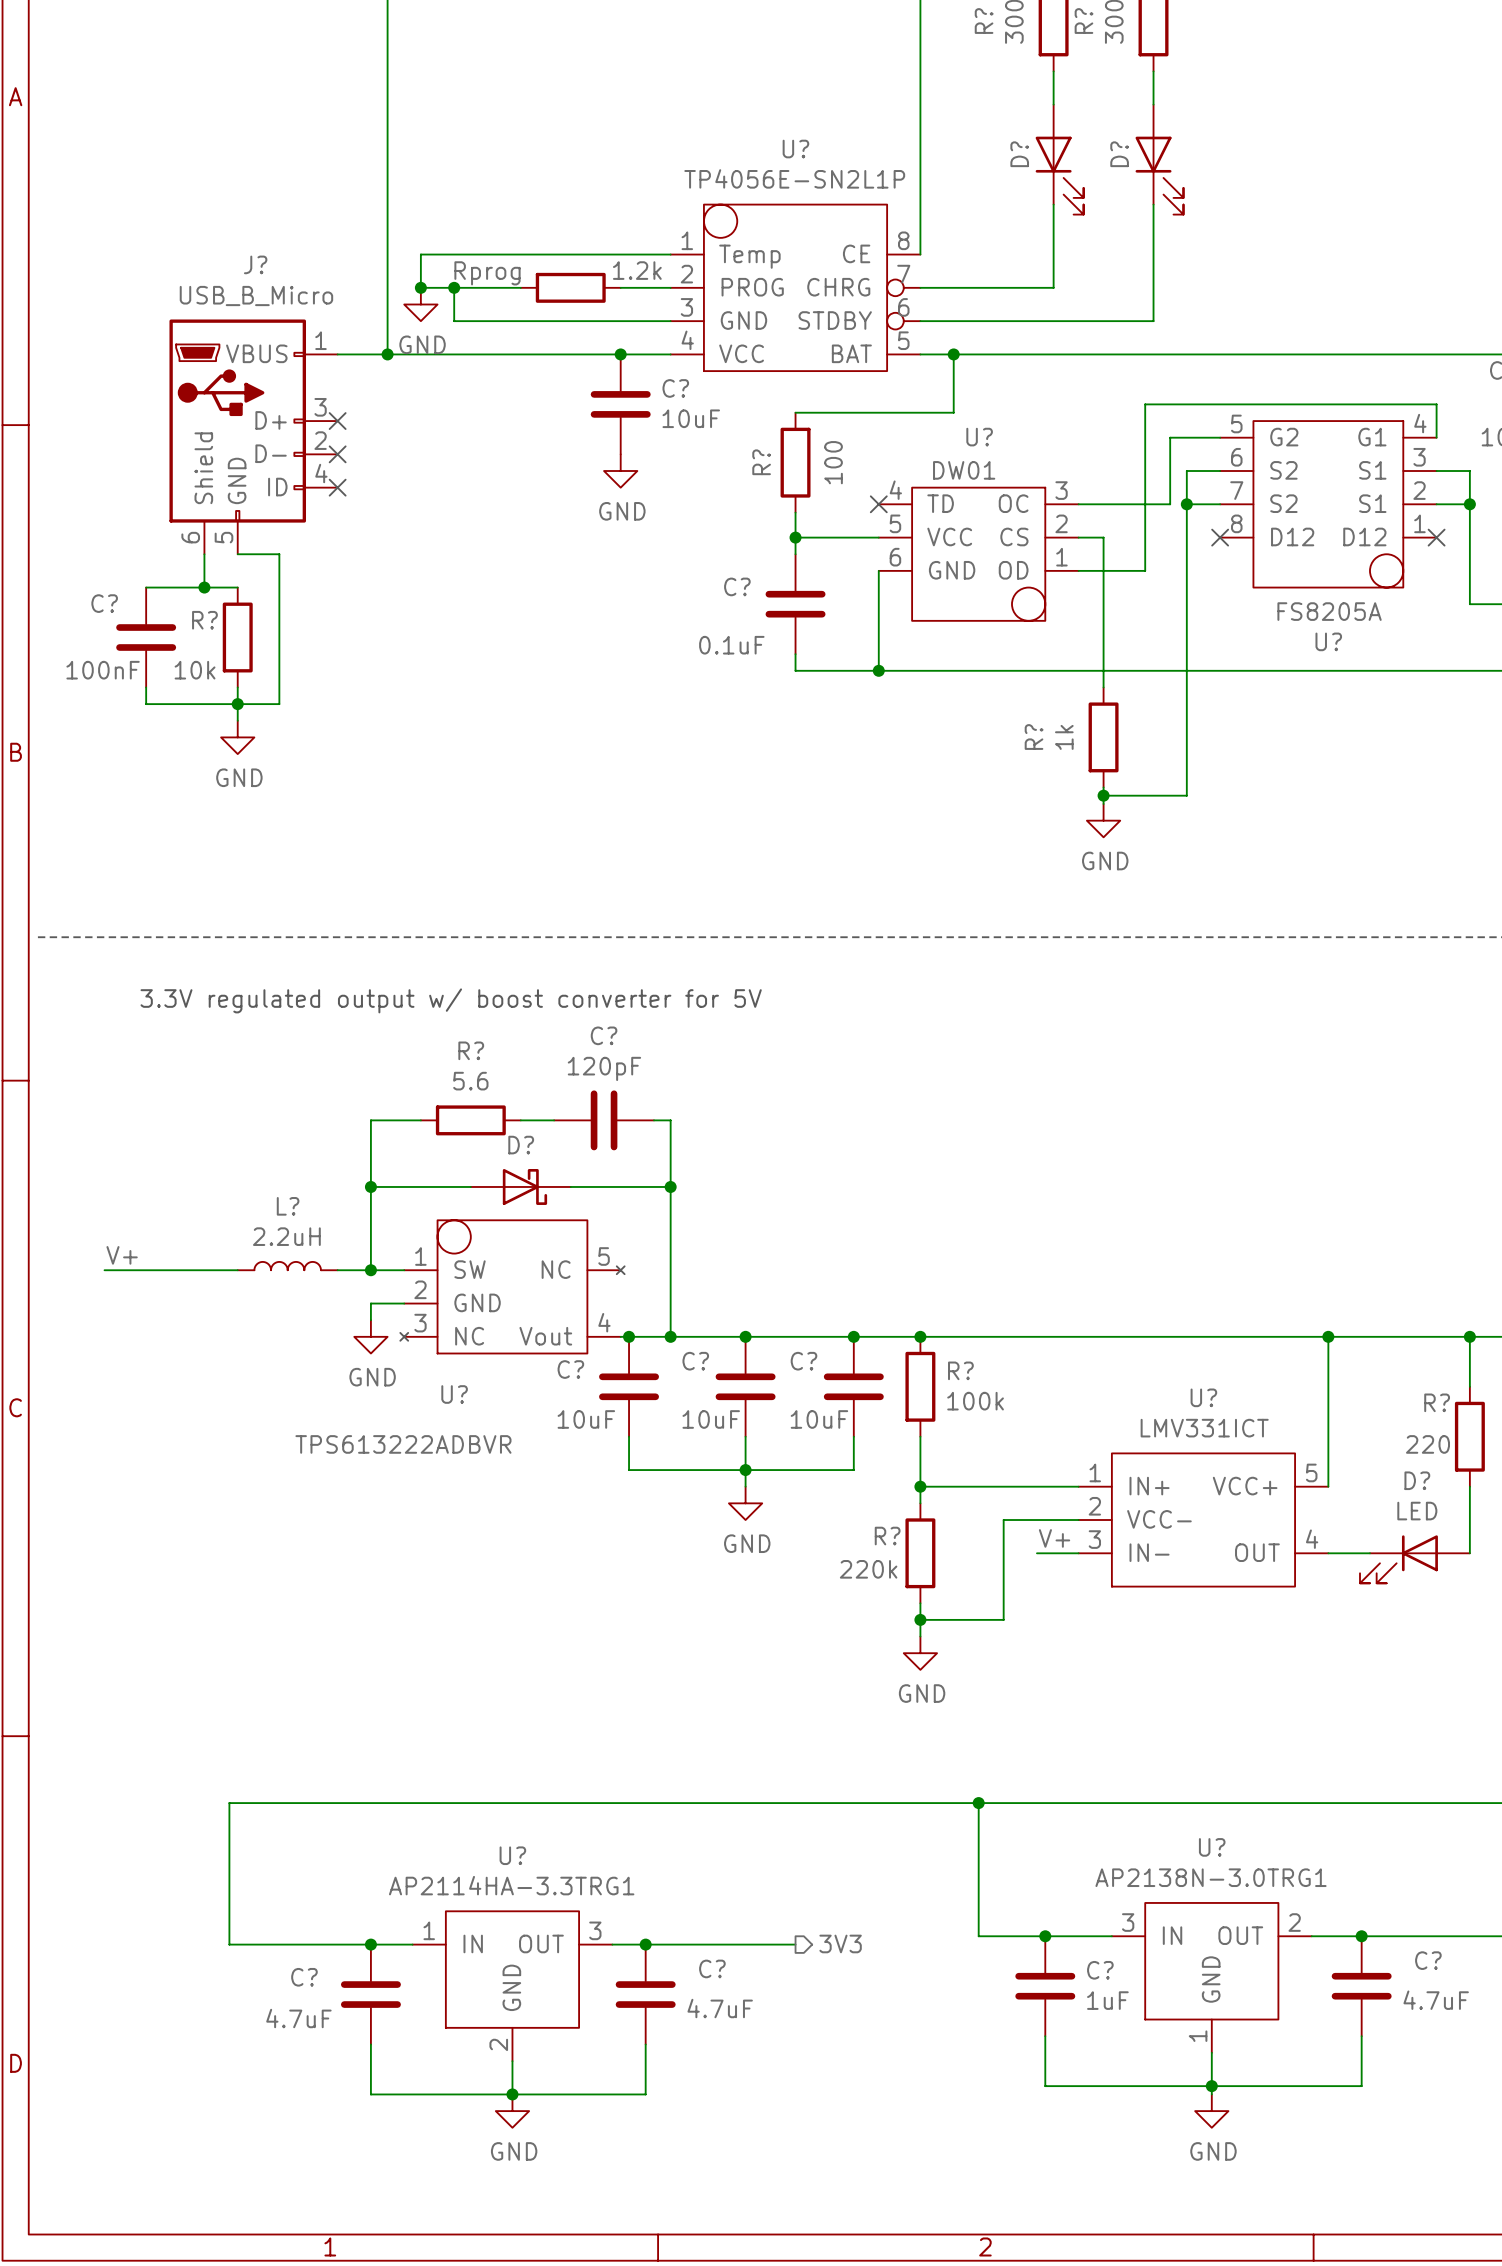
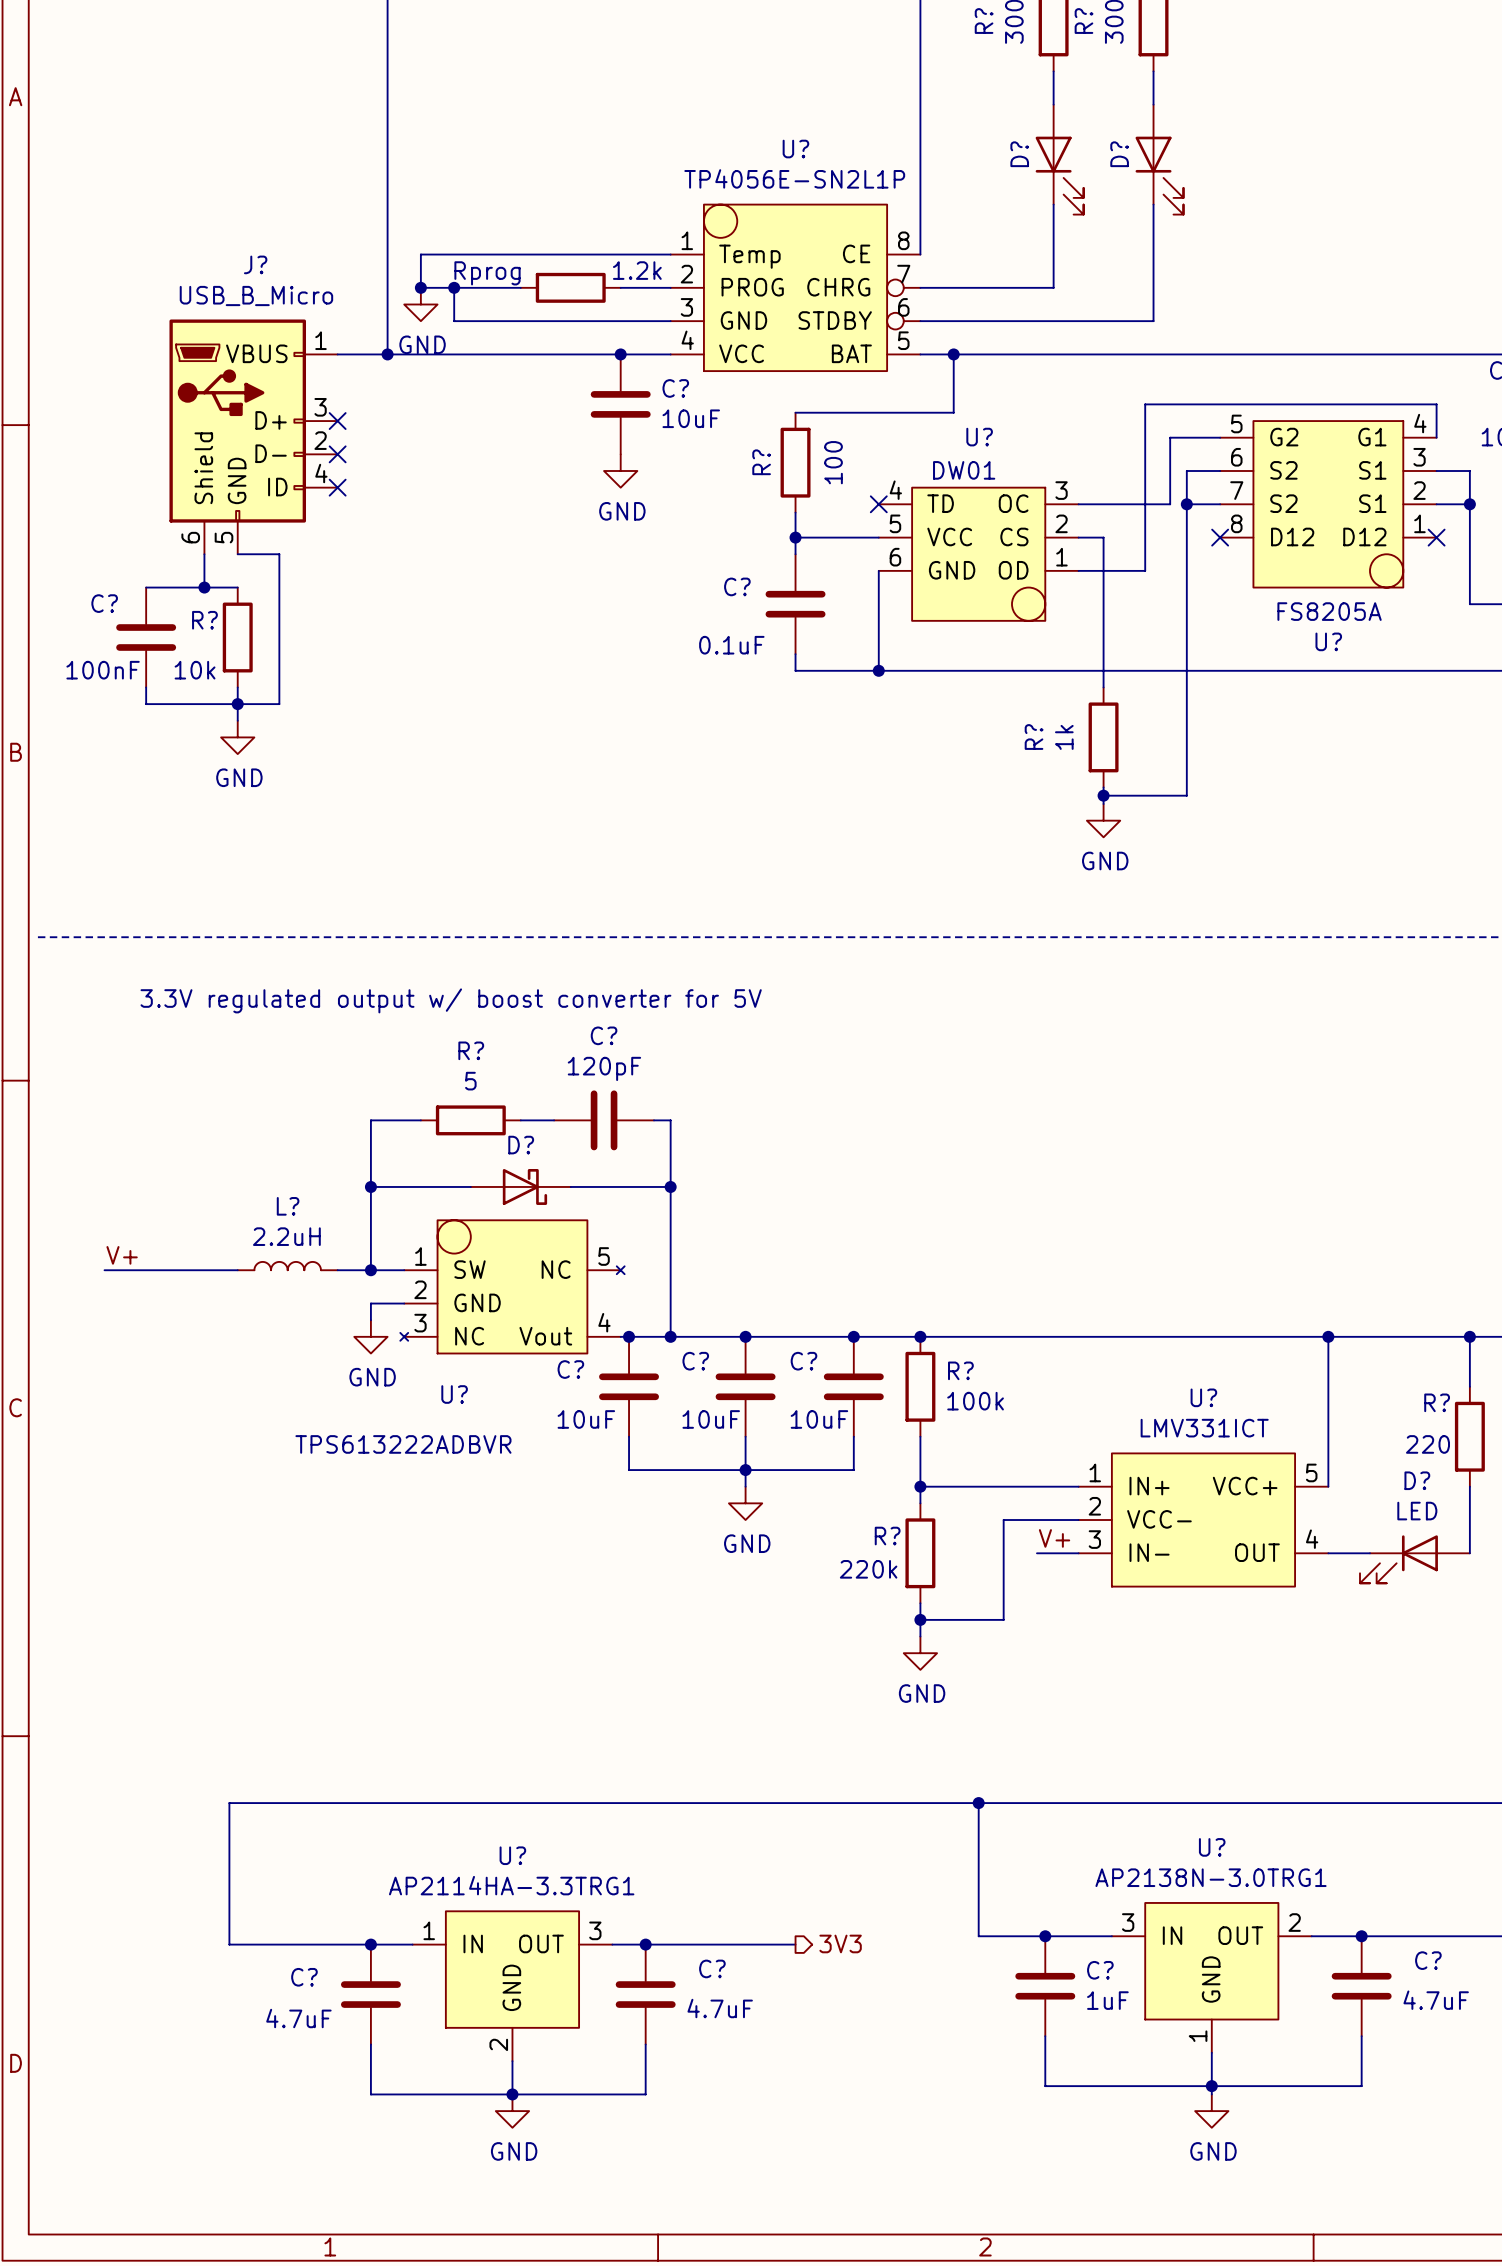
R? value: 5.6 (470, 1081) -> 5 (470, 1081)

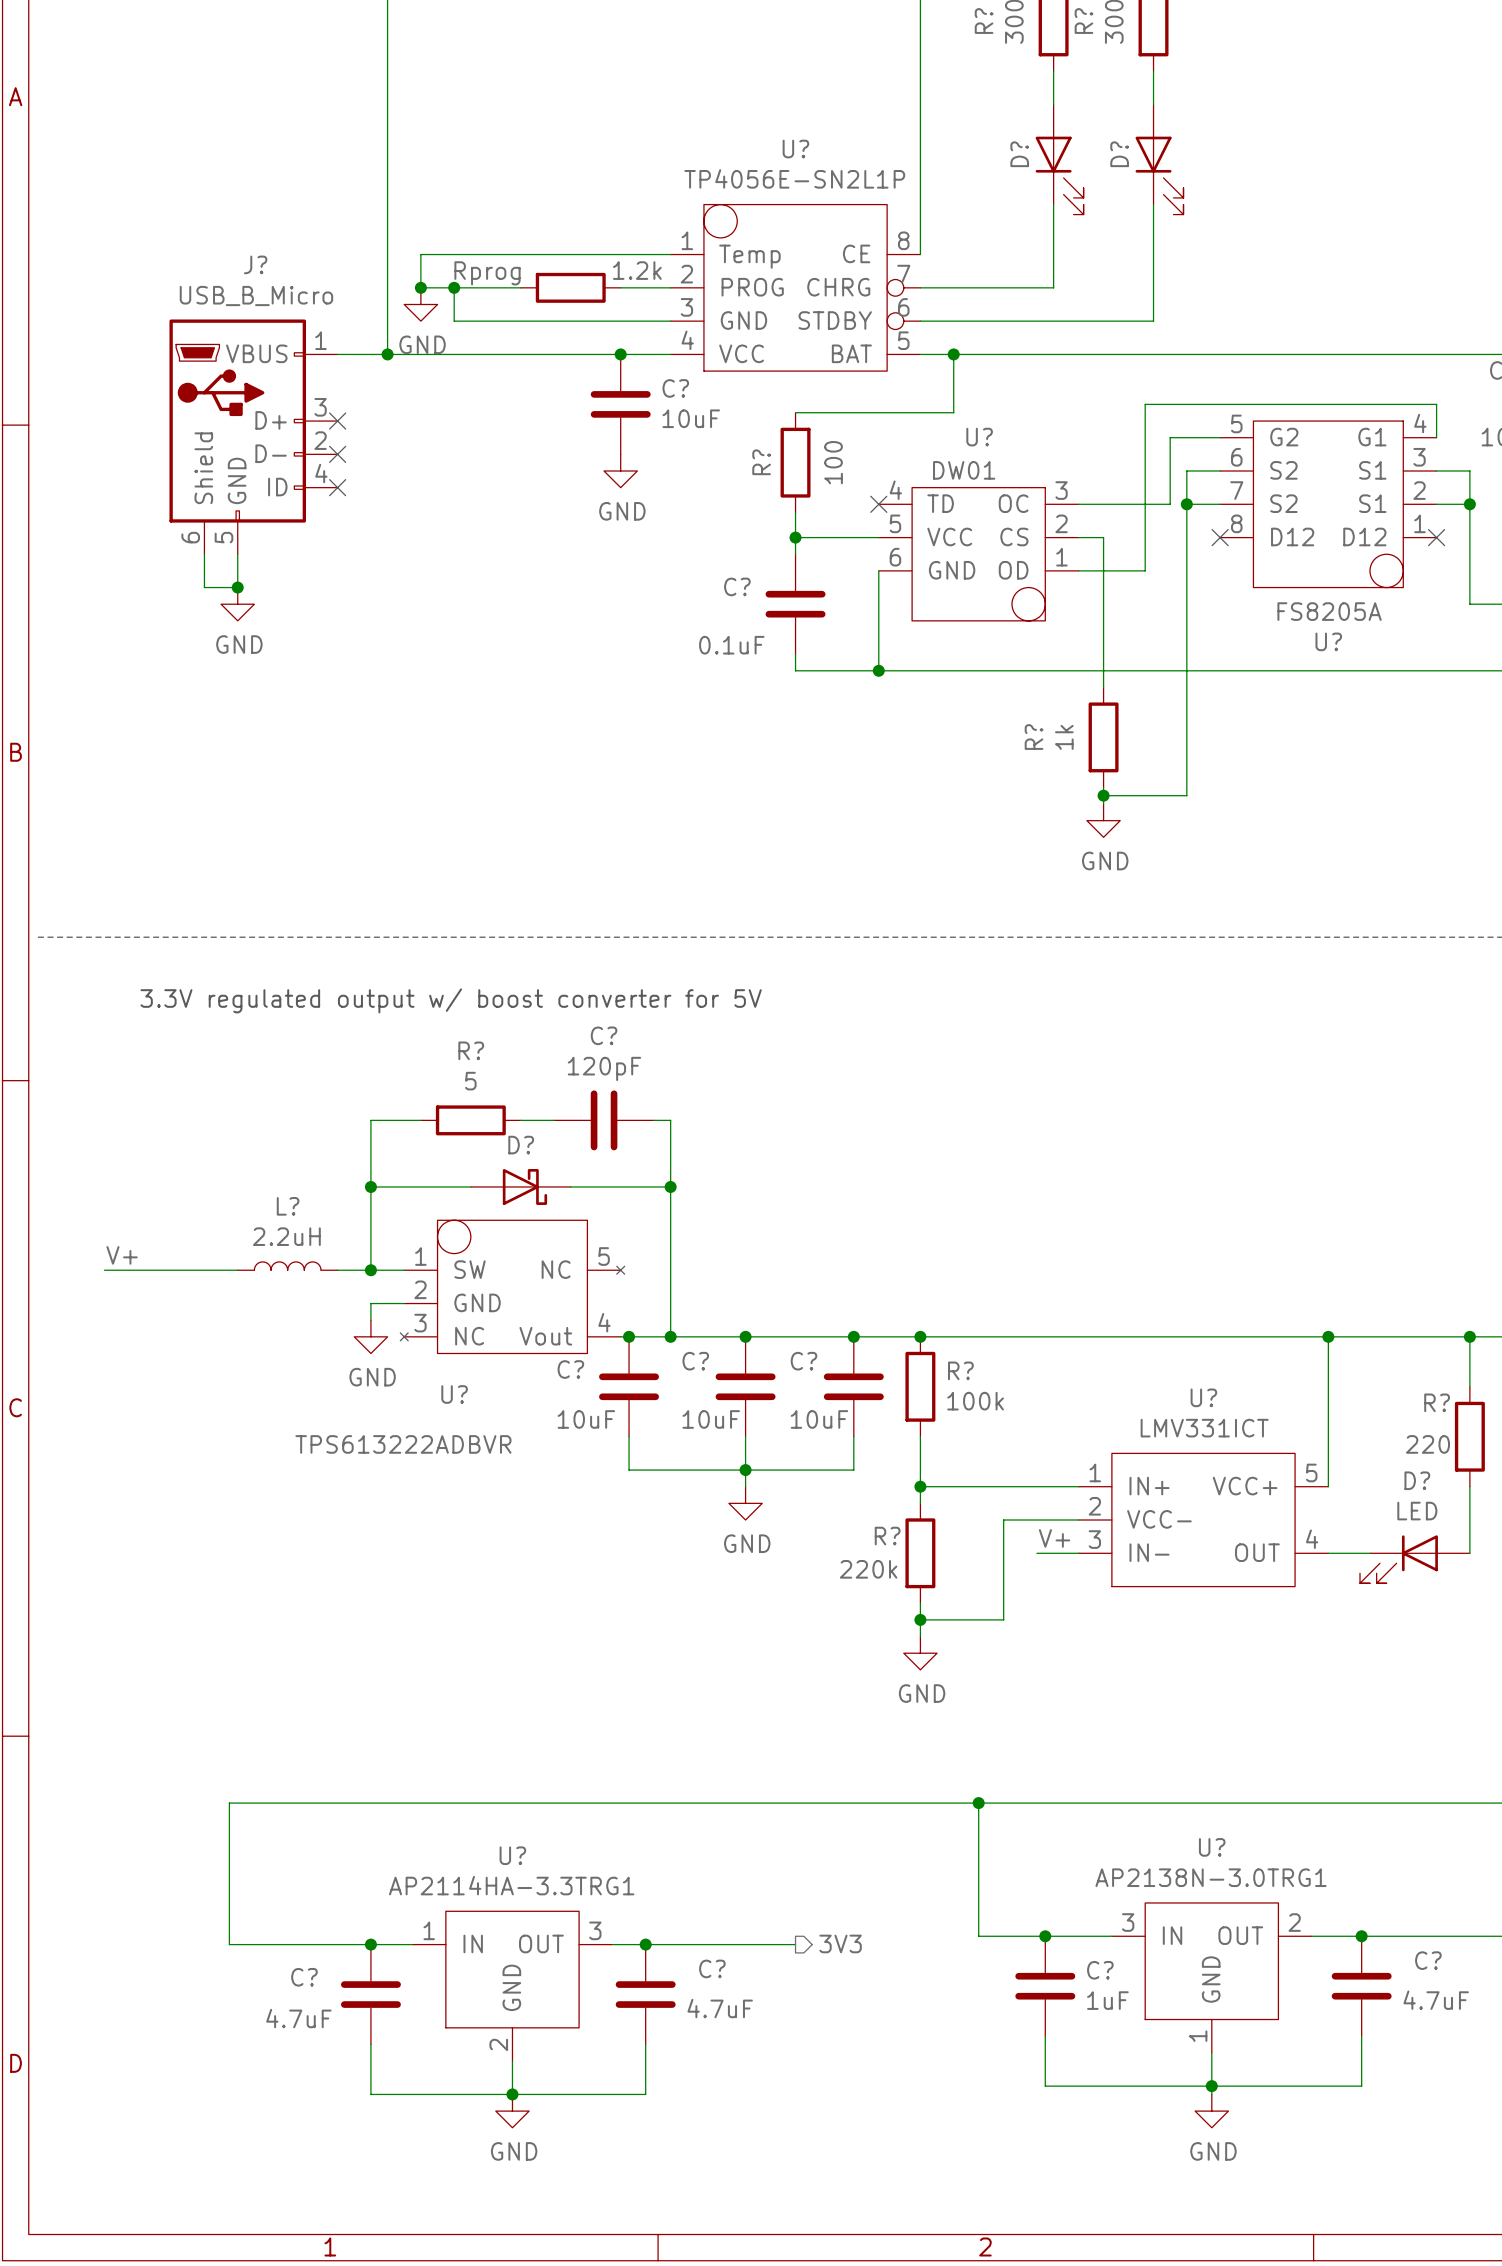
wire: (237, 554) (279, 554) (279, 704) (146, 704) (146, 687) -> (237, 554) (237, 587)
wire: (146, 587) (204, 587) -> none
junction position: (204, 587) -> (237, 587)
C?: 100nF (146, 637) -> none
R?: 10k (237, 637) -> none
wire: (237, 687) (237, 720) -> none
junction: (237, 704) -> none
power symbol position: GND (237, 737) -> GND (237, 604)

